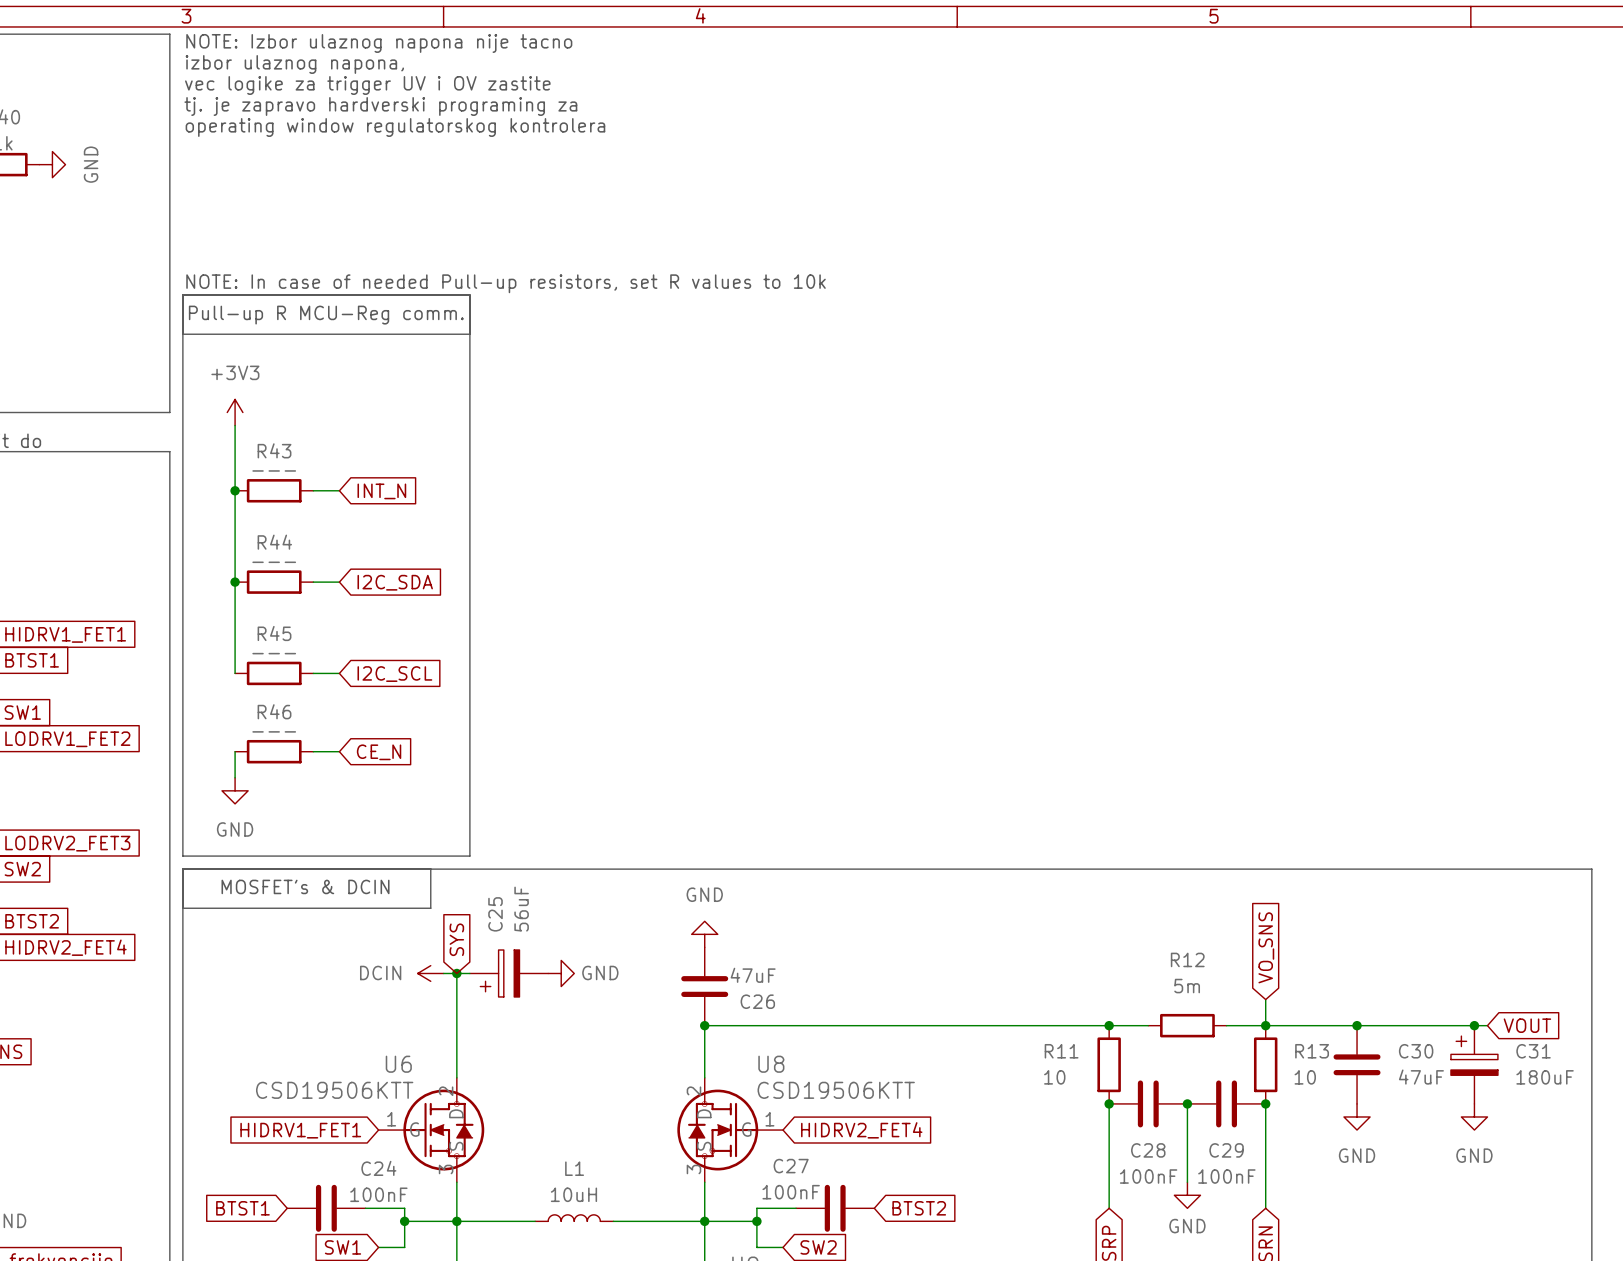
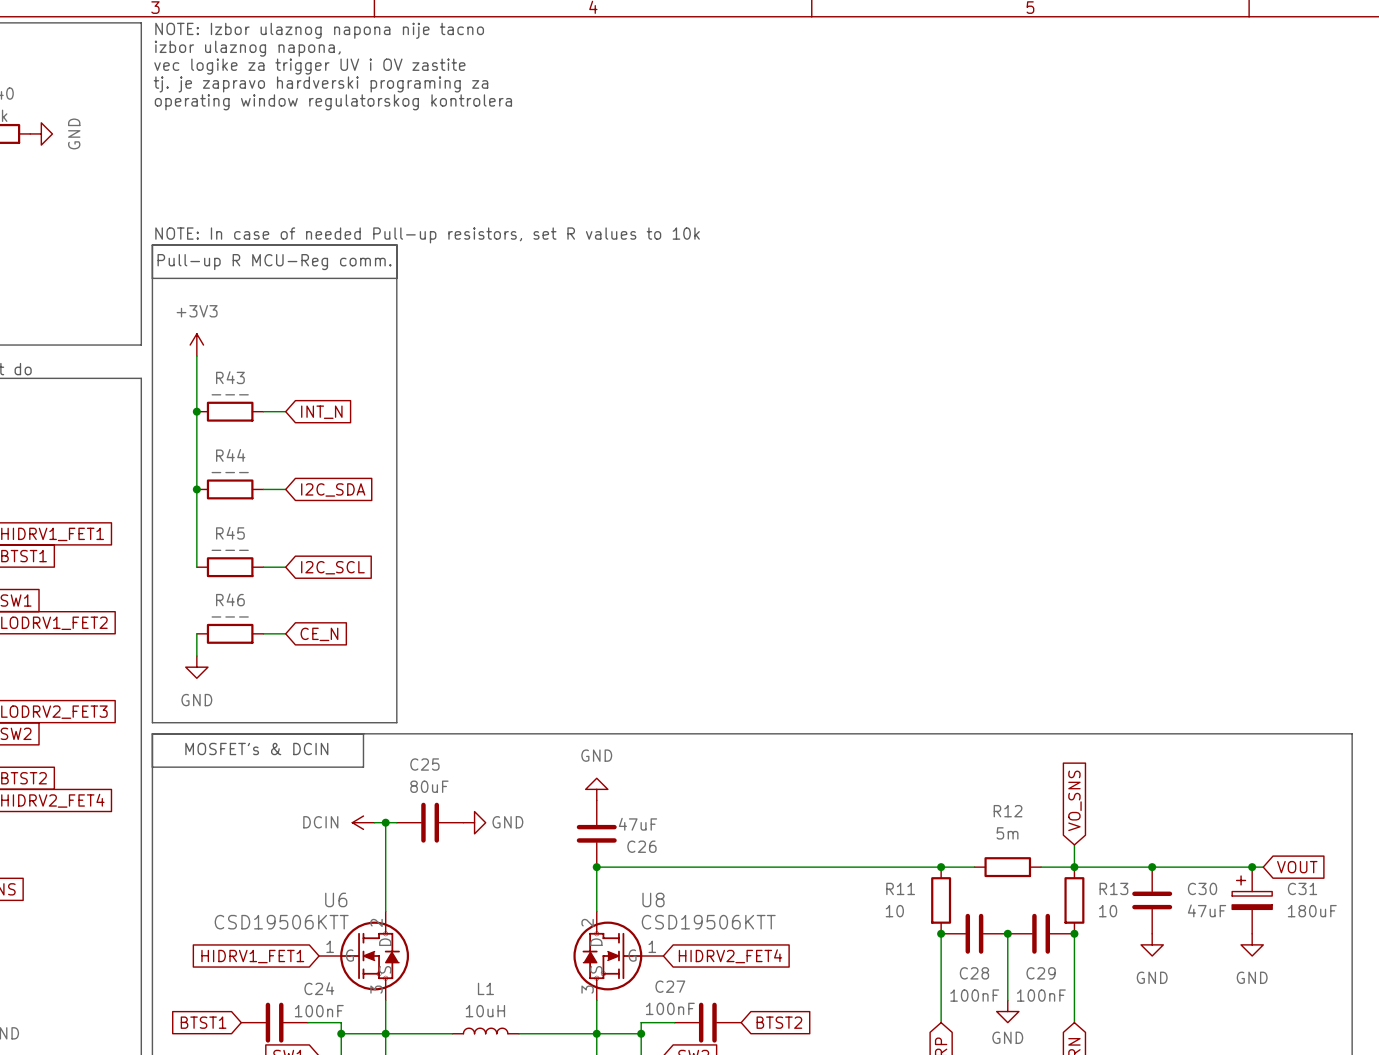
C25 value: 56uF (521, 909) -> 80uF (429, 786)
global label: SYS (456, 939) -> none
C25 symbol: [469, 950, 549, 997] -> [396, 802, 464, 843]

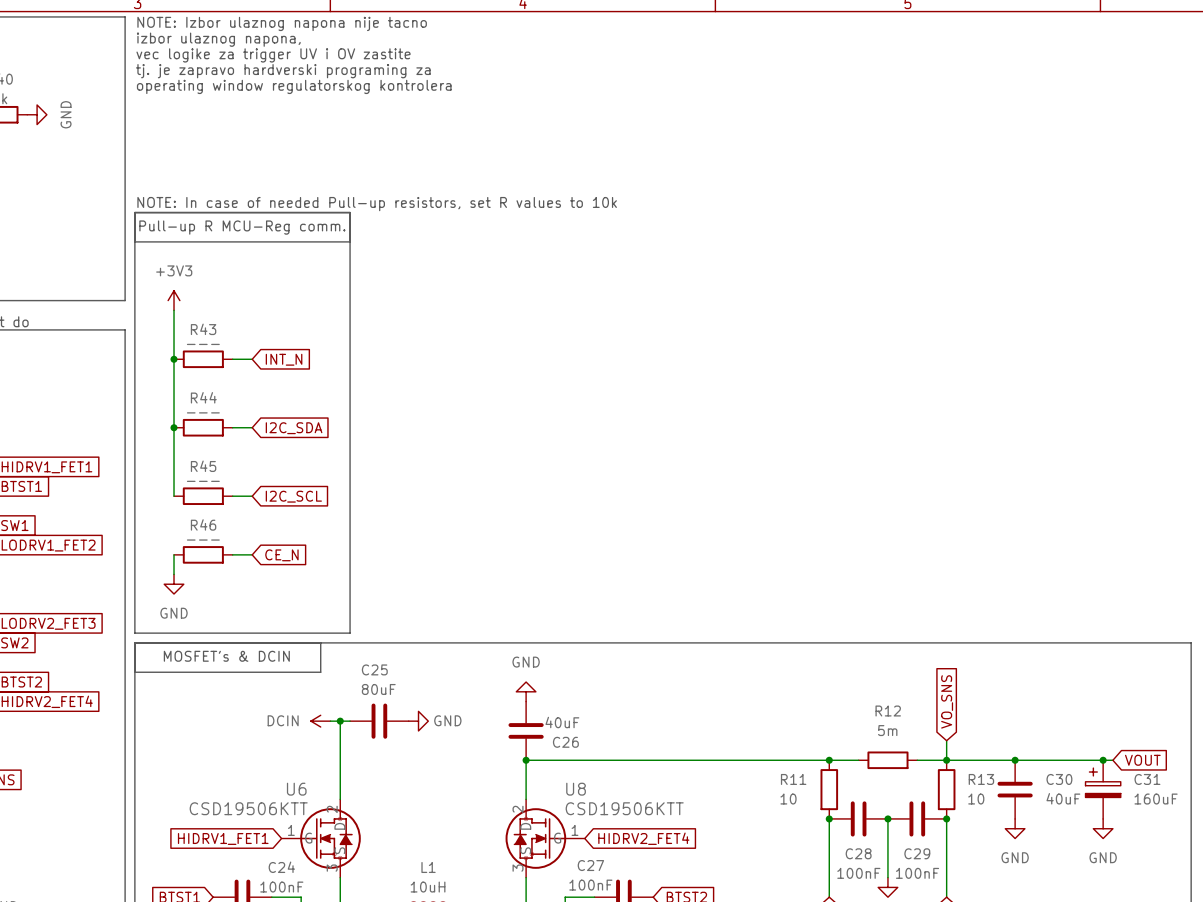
C26 value: 47uF (637, 824) -> 40uF (562, 722)
C30 value: 47uF (1207, 910) -> 40uF (1063, 798)
C31 value: 180uF (1312, 911) -> 160uF (1156, 799)

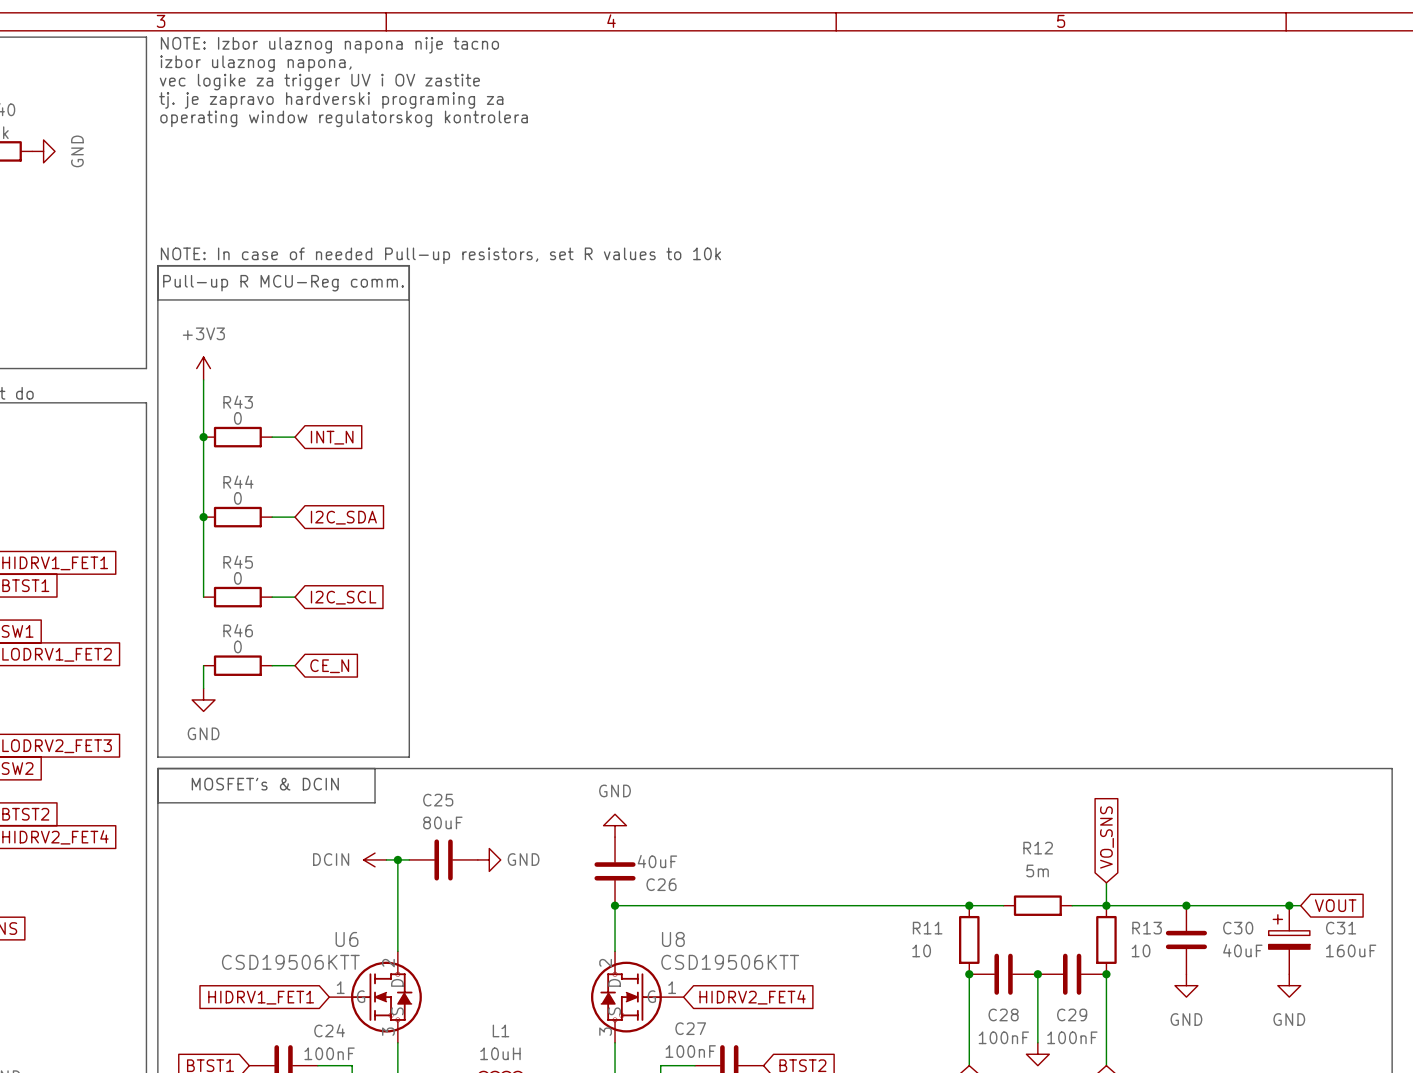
R43 value: --- (203, 344) -> 0 (237, 418)
R44 value: --- (203, 412) -> 0 (237, 498)
R45 value: --- (203, 481) -> 0 (237, 578)
R46 value: --- (203, 540) -> 0 (237, 646)

